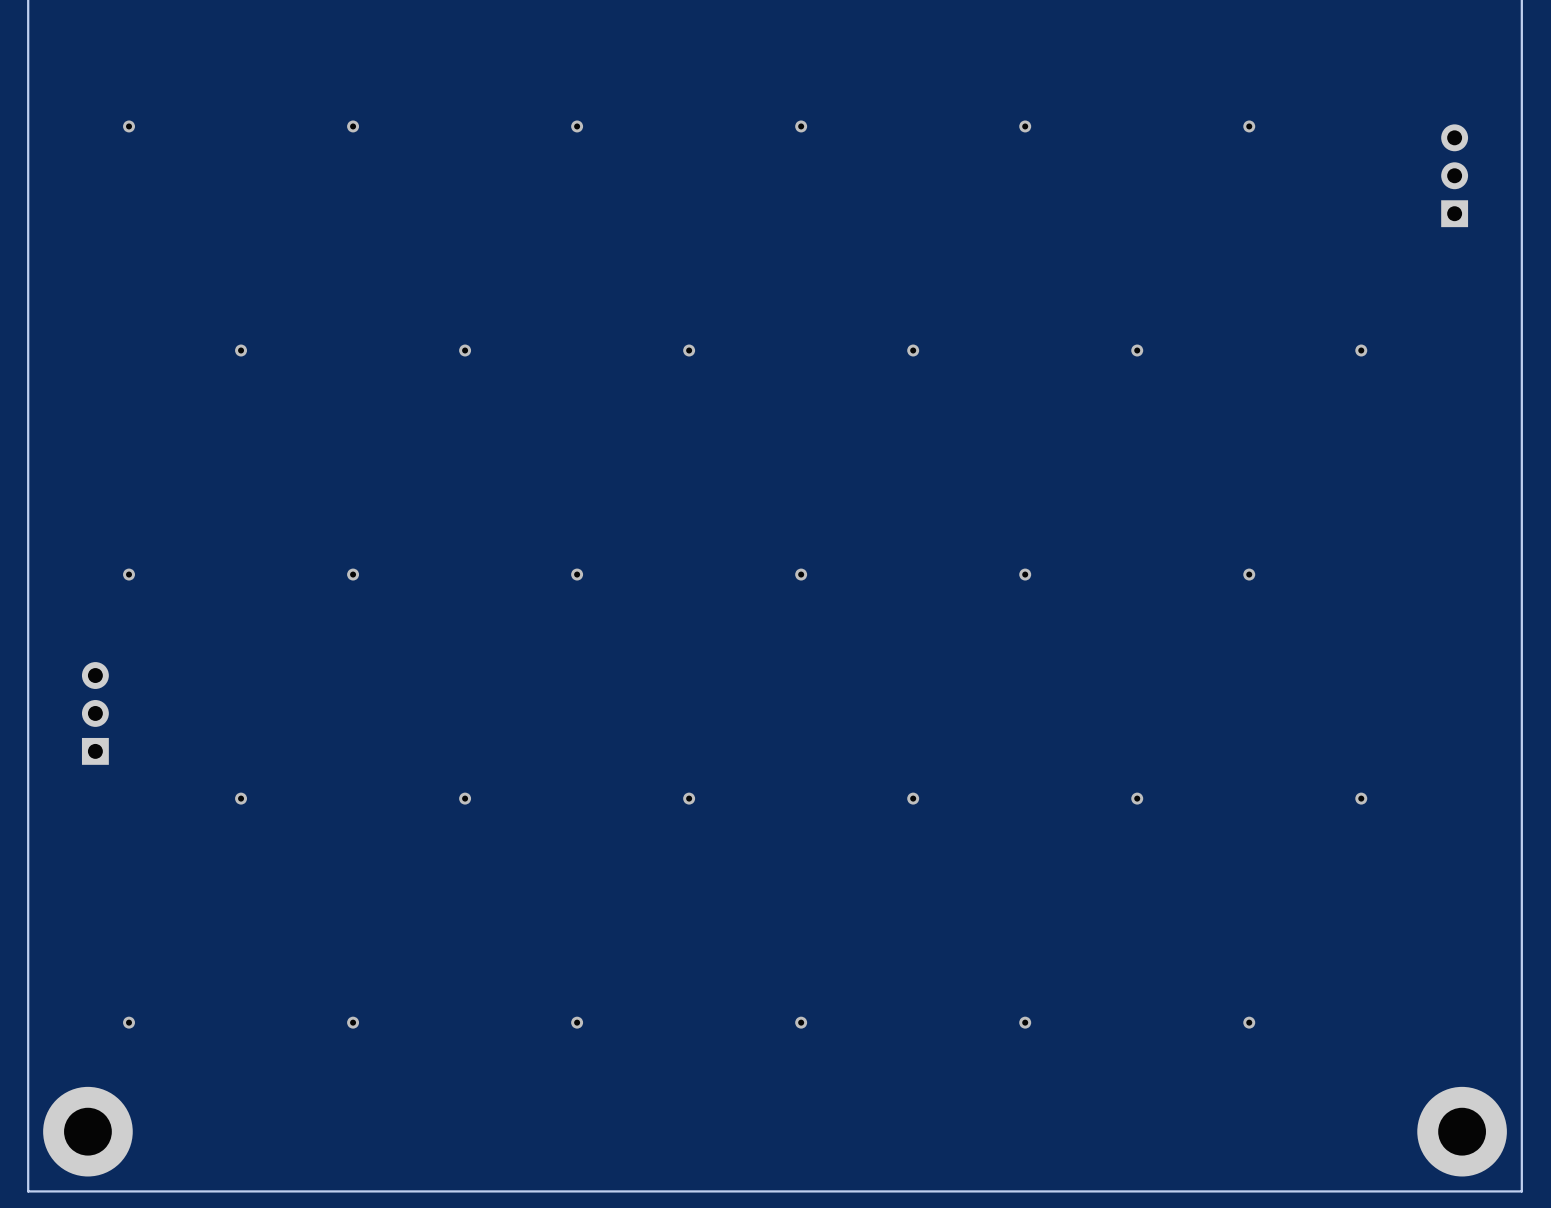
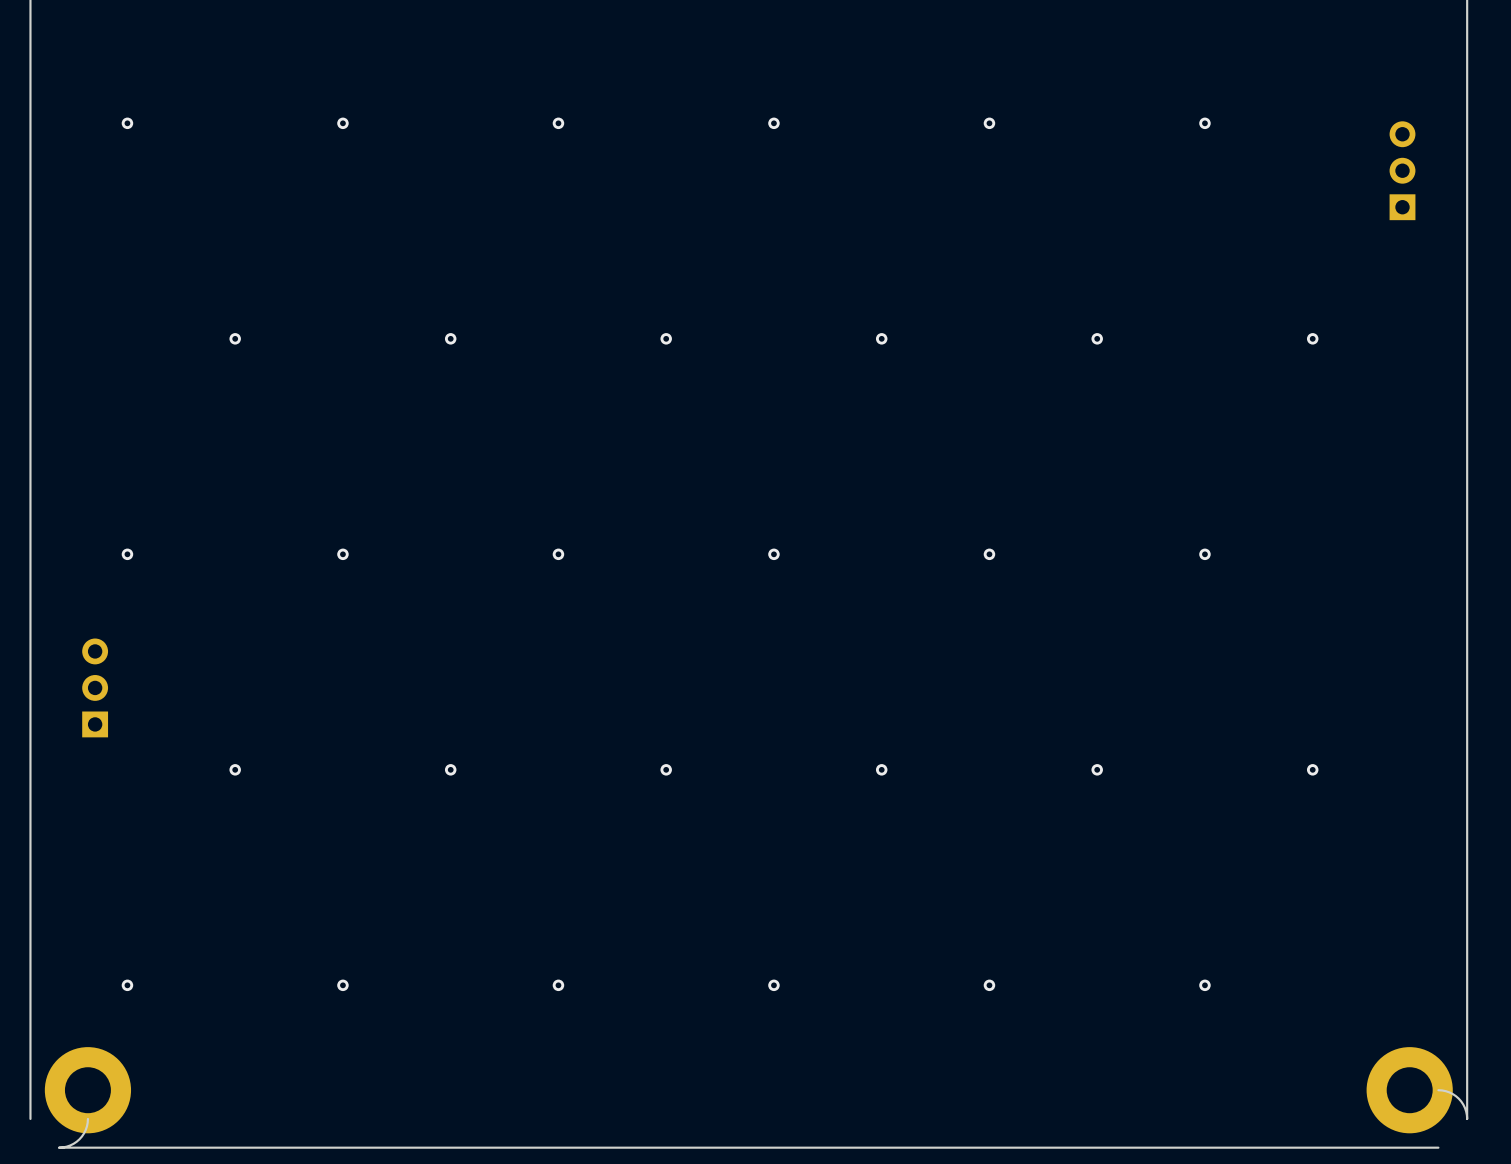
board edge: (28, 1161) (28, 1191) (58, 1191) -> (87, 1118) (85, 1129) (79, 1139) (70, 1145) (59, 1147)
board edge: (1521, 1161) (1521, 1191) (1491, 1191) -> (1467, 1118) (1464, 1107) (1458, 1098) (1449, 1092) (1438, 1090)

